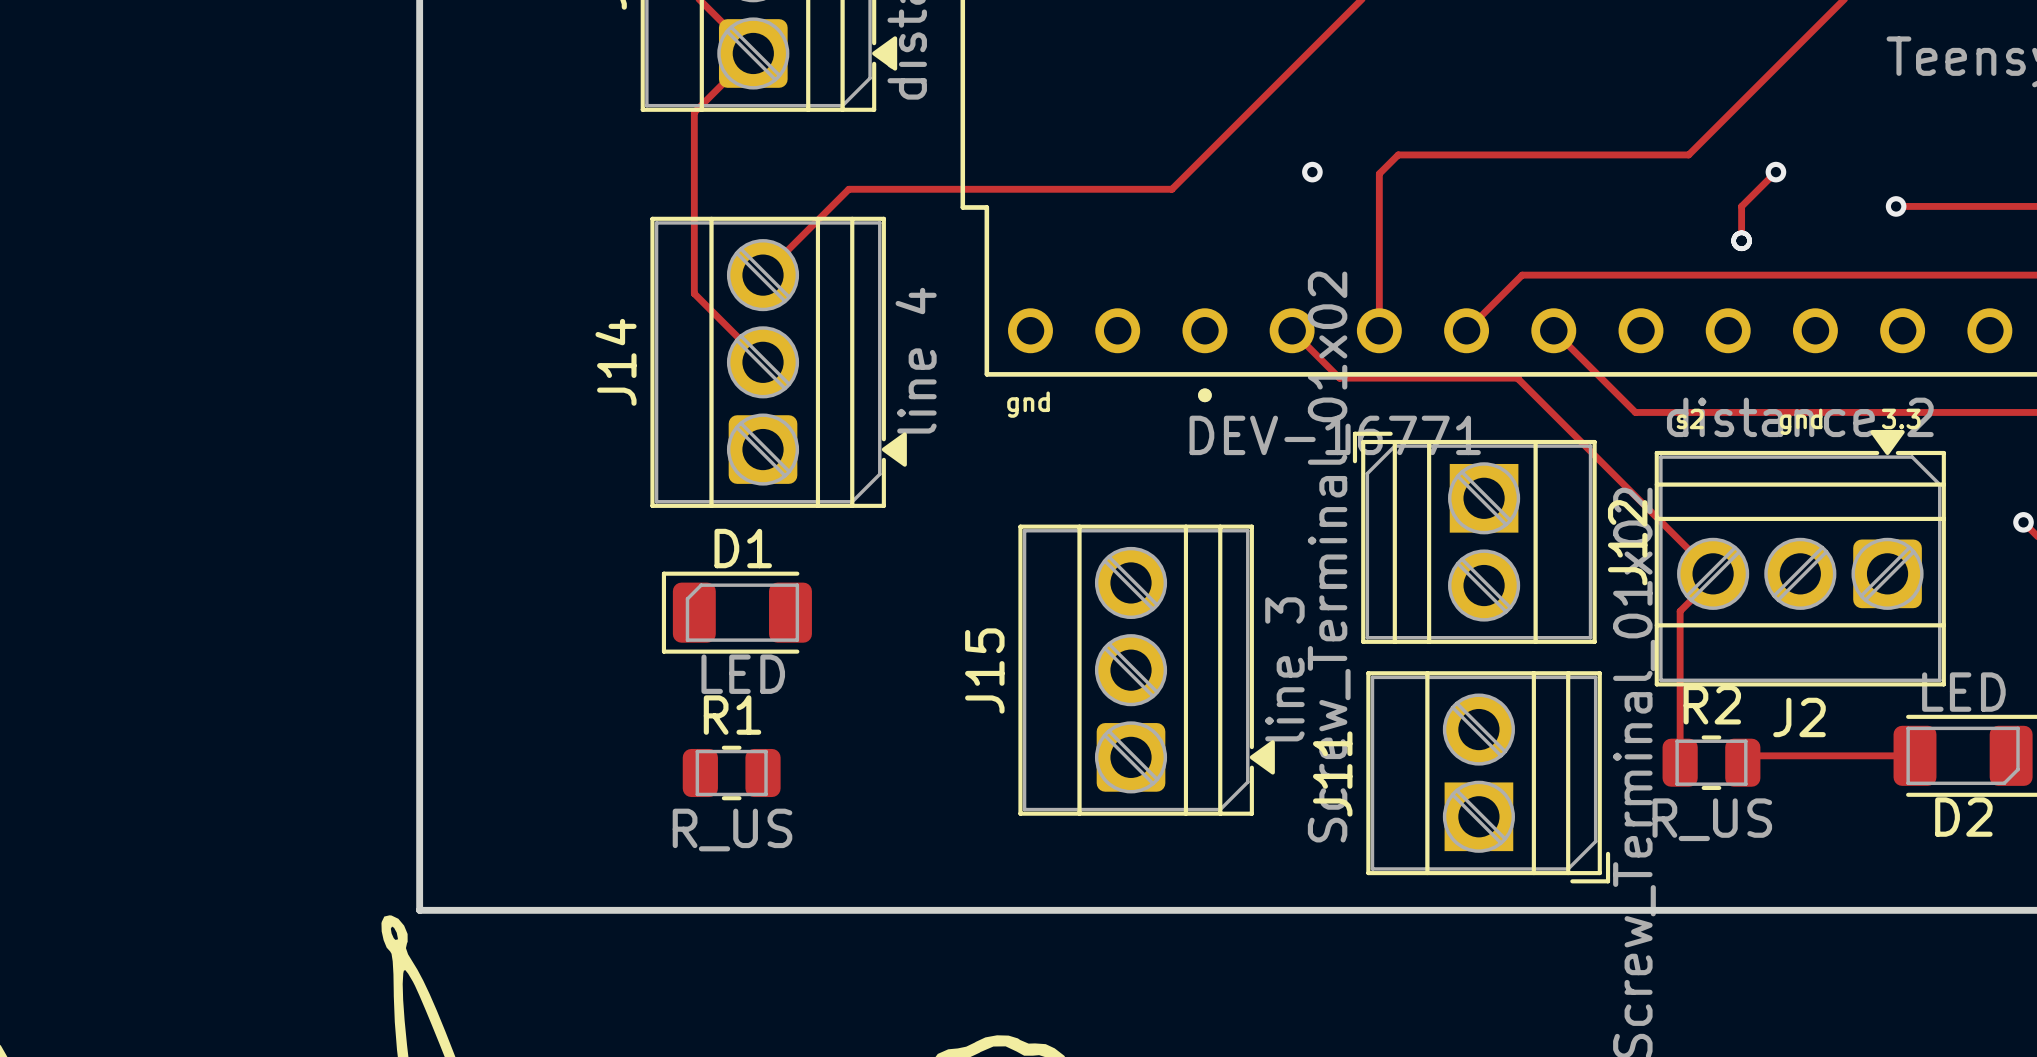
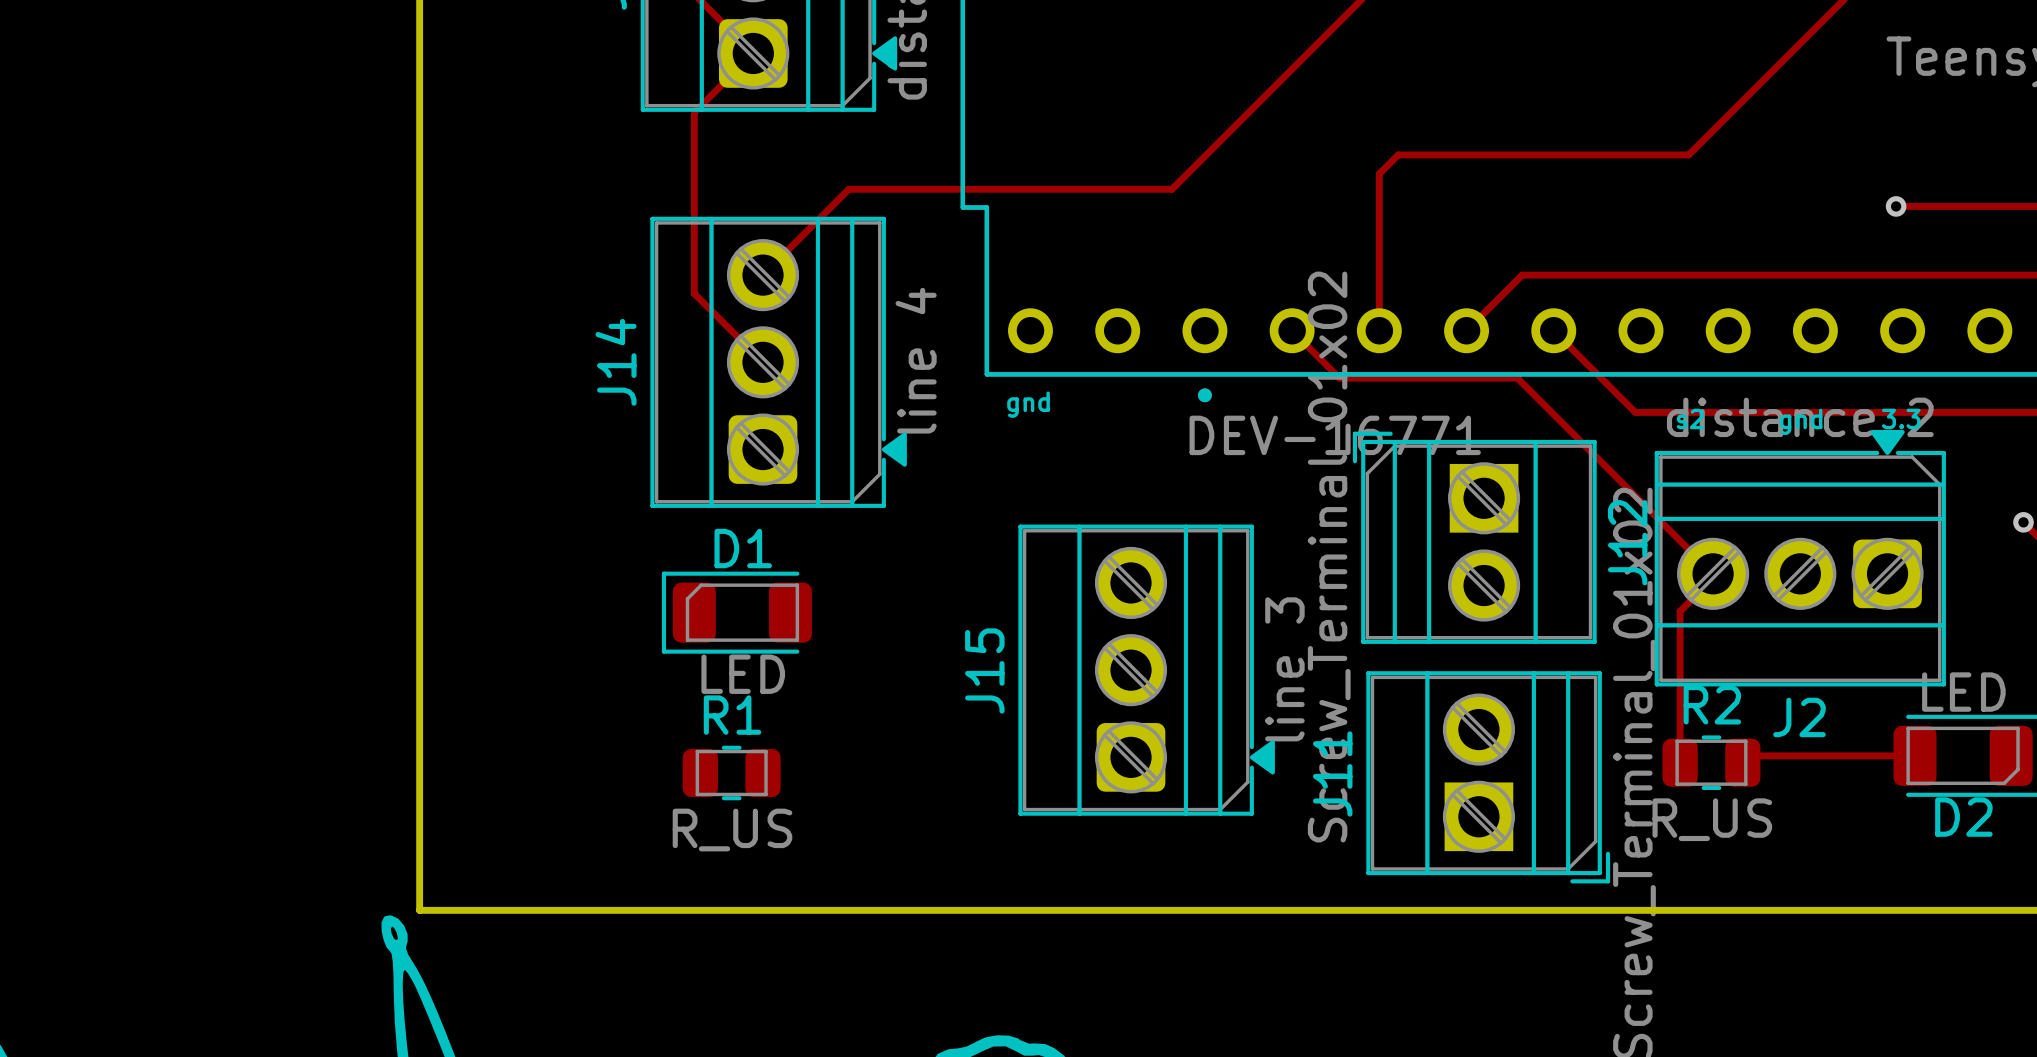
via: (1312, 172) -> none
track: (1775, 172) (1741, 206) (1741, 240) -> none
via: (1775, 172) -> none
via: (1741, 240) -> none

